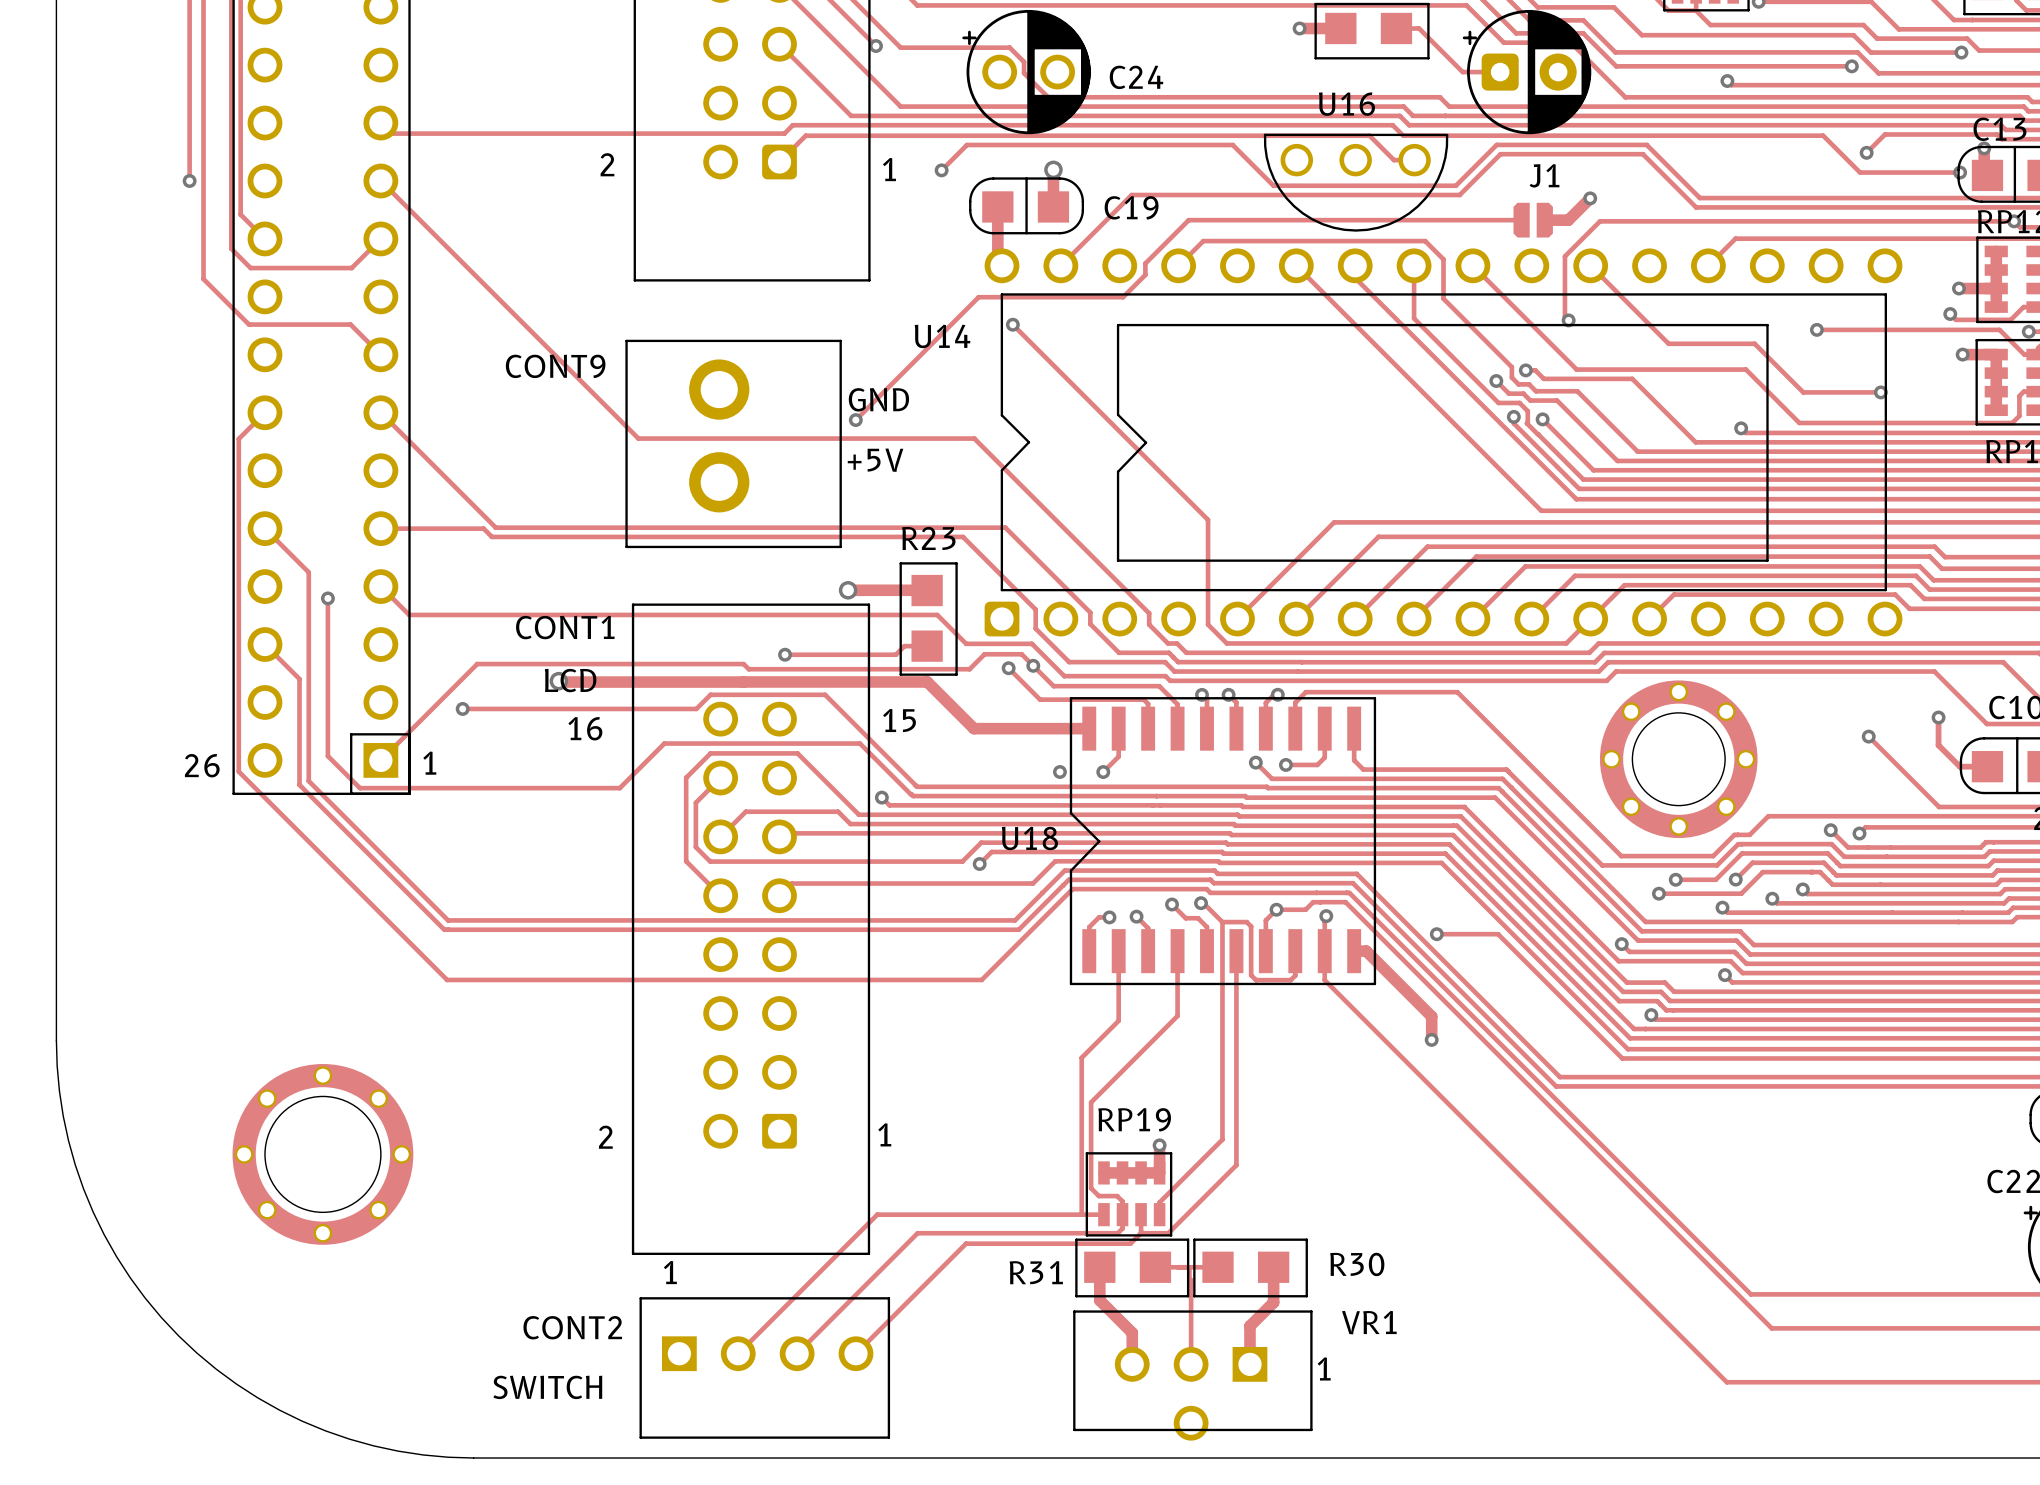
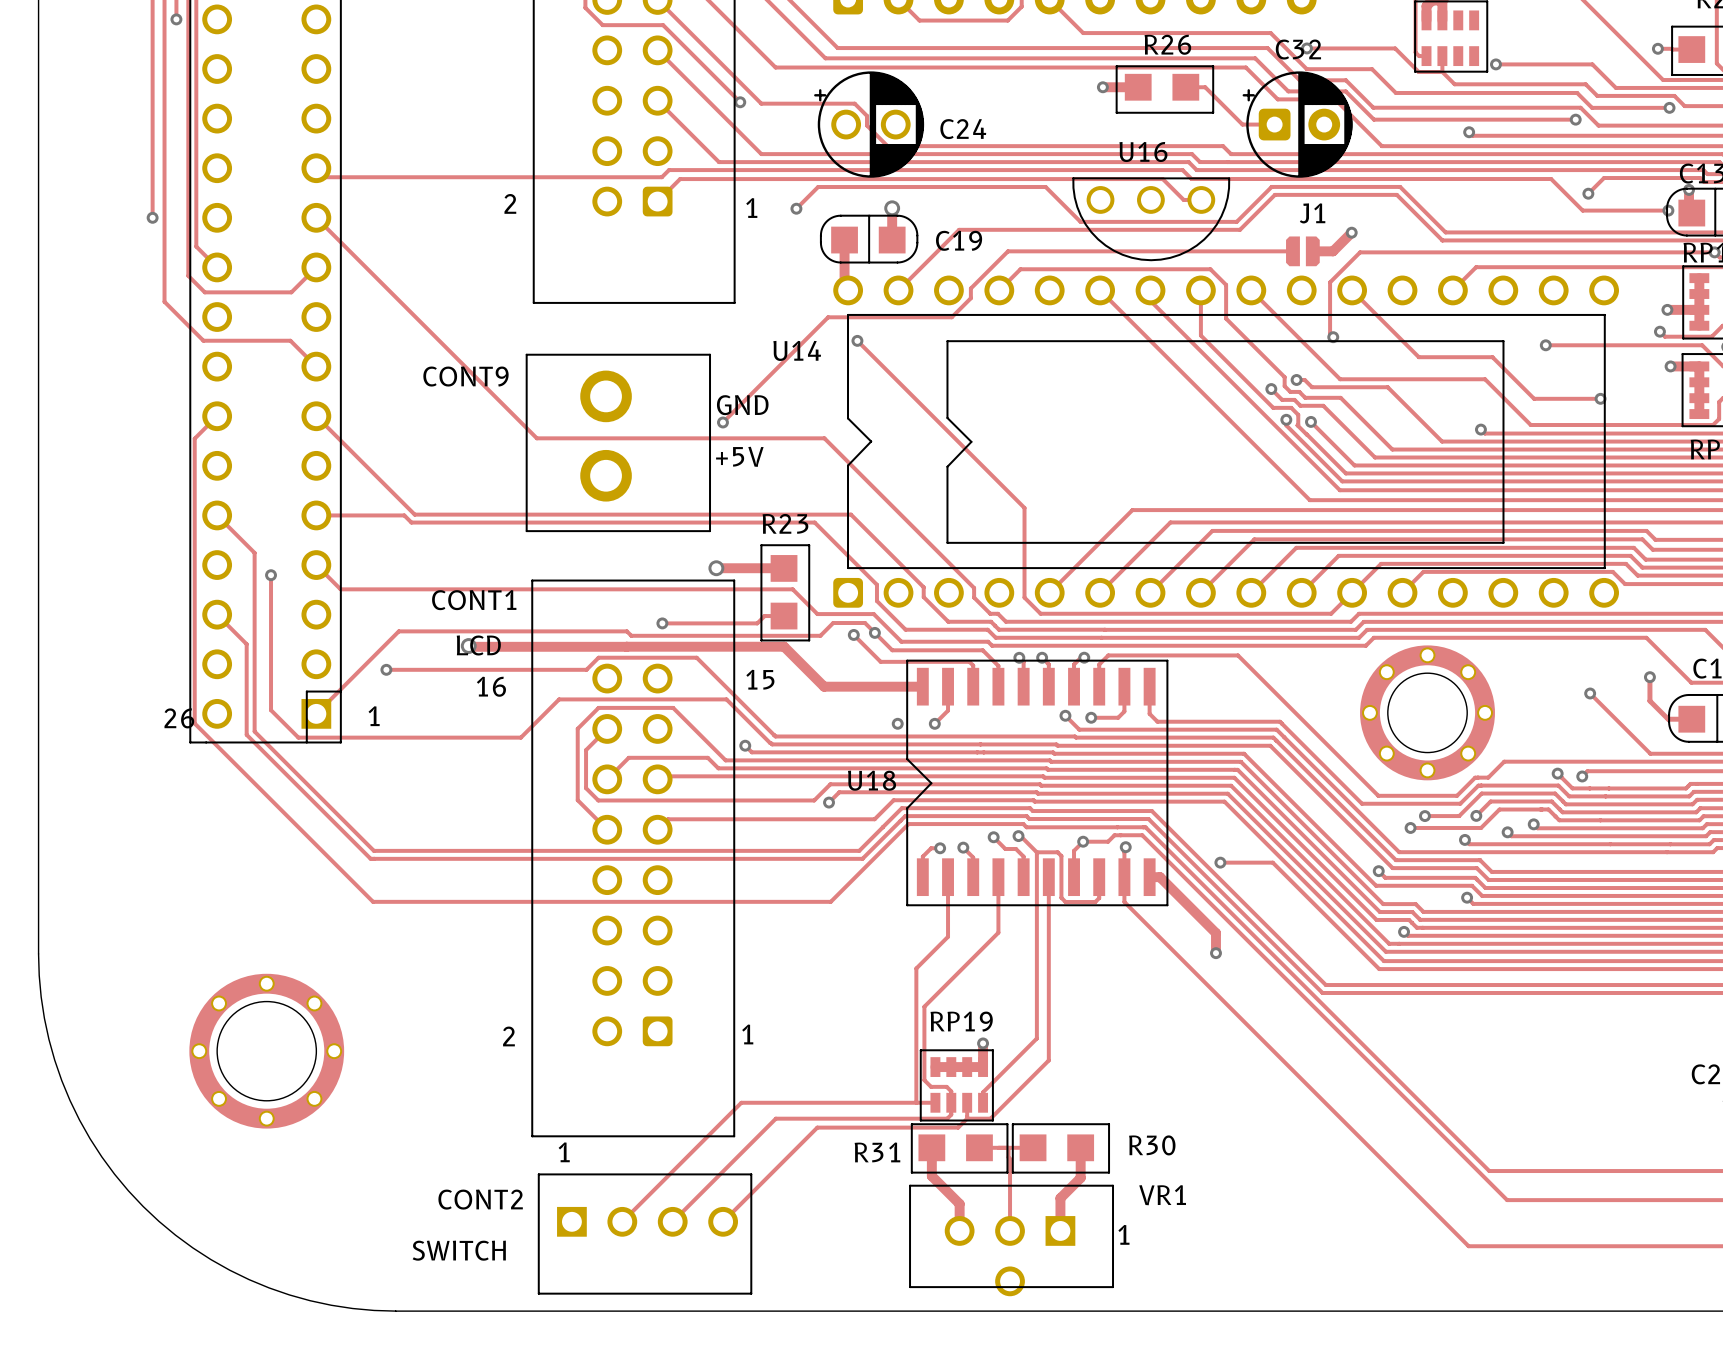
line: (369, 734) (351, 734) (351, 793) -> (306, 691) (306, 742)
text position: 1 (429, 763) -> 1 (374, 716)
text position: 26 (202, 765) -> 26 (179, 718)

